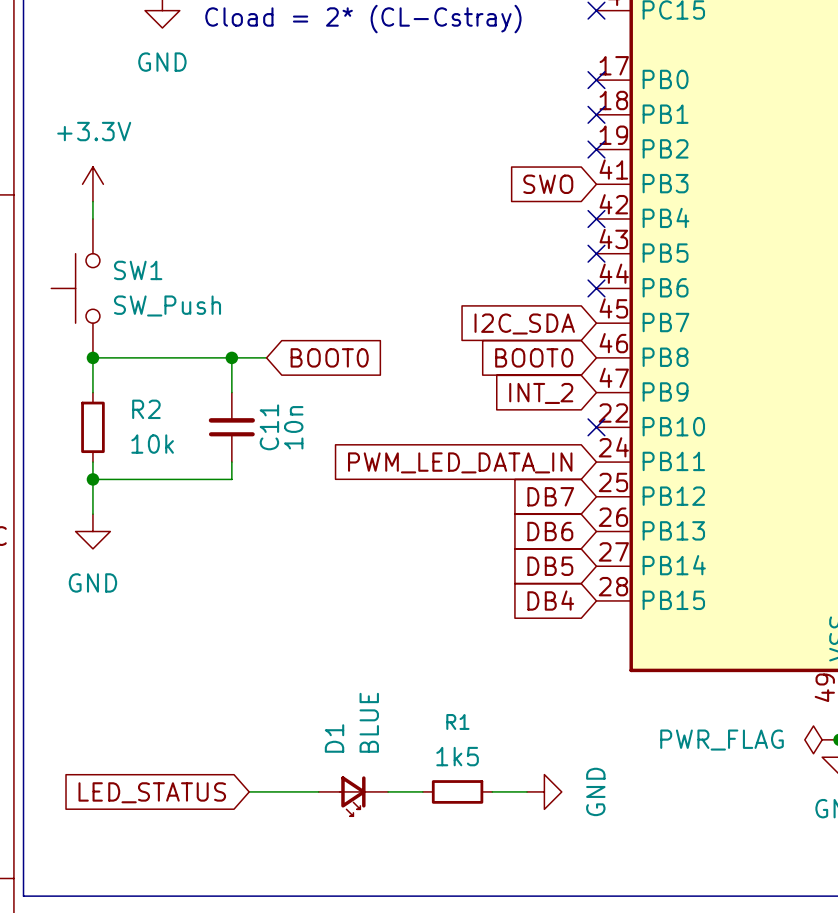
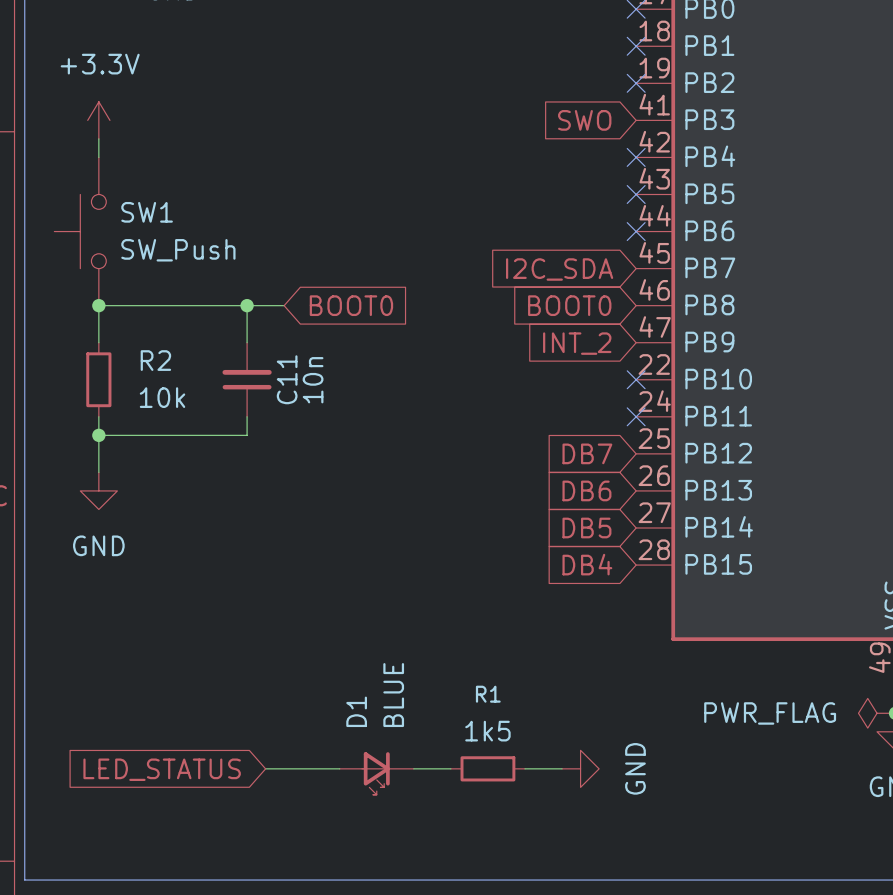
global label: PWM_LED_DATA_IN (460, 462) -> none
no-connect mark: none -> (636, 416)

